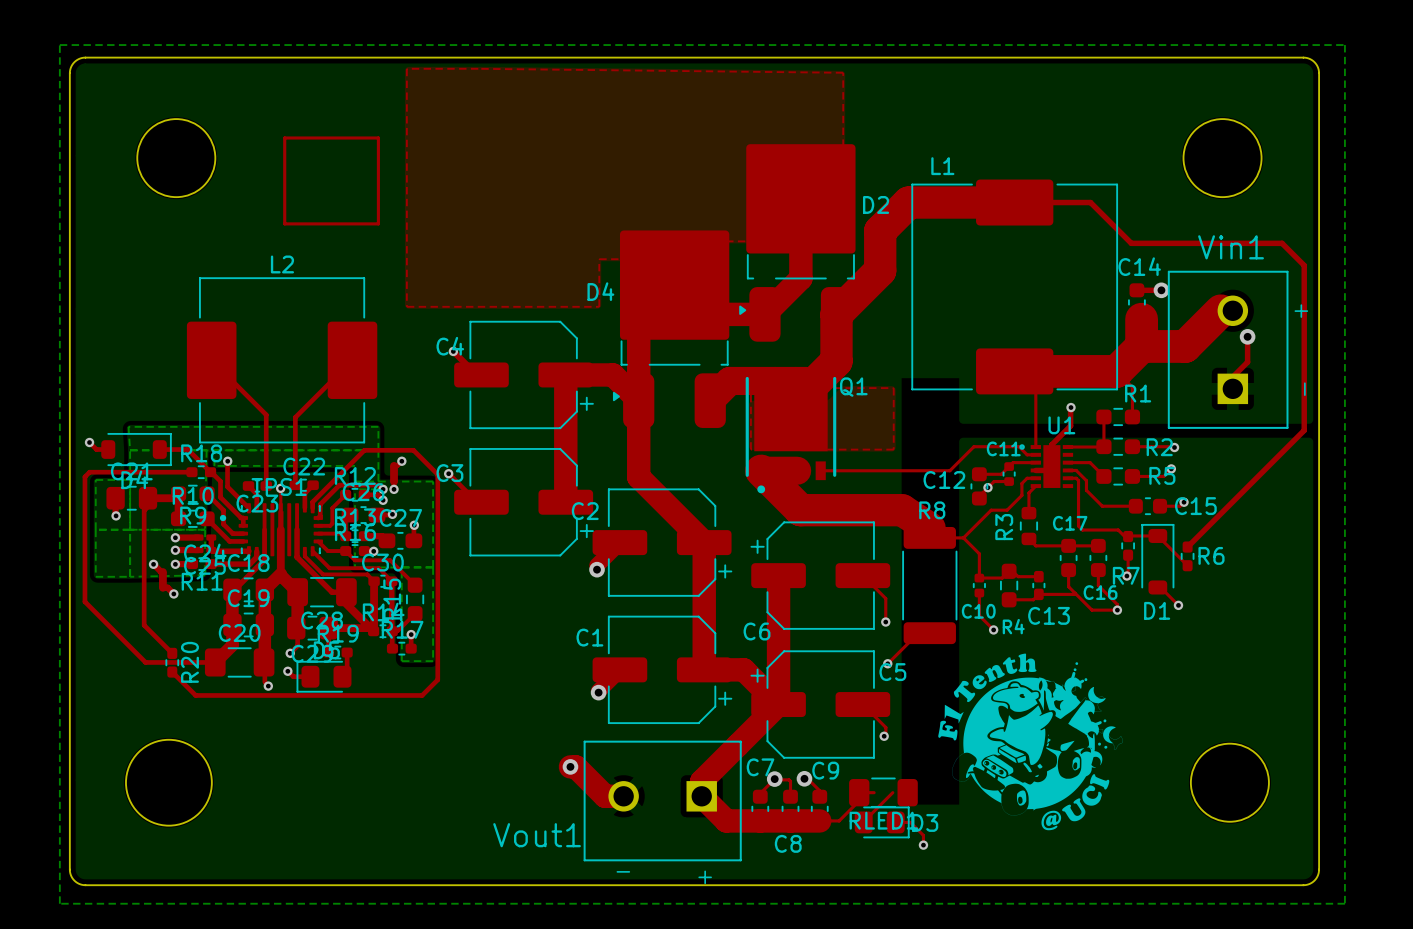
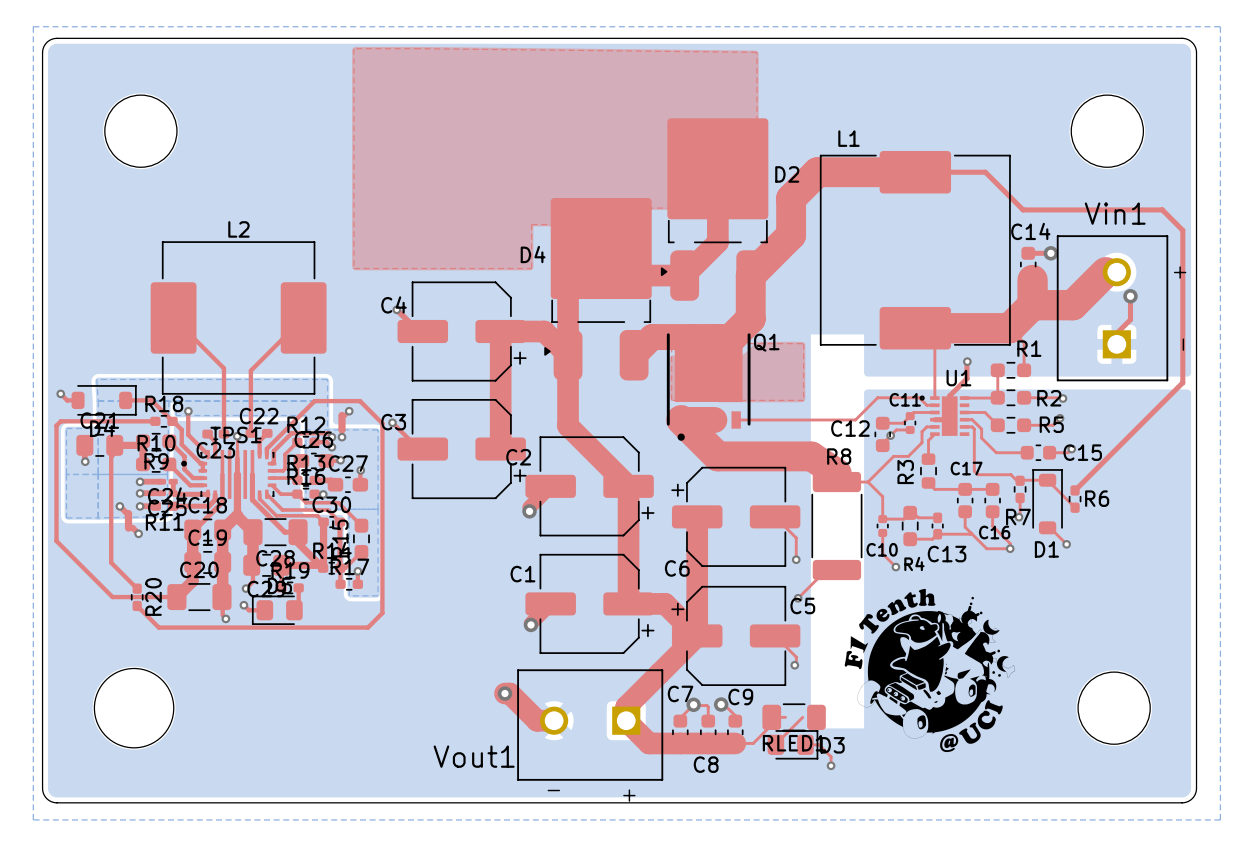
top track: (284, 138) (378, 138) (378, 223) (284, 223) (284, 138) -> none

